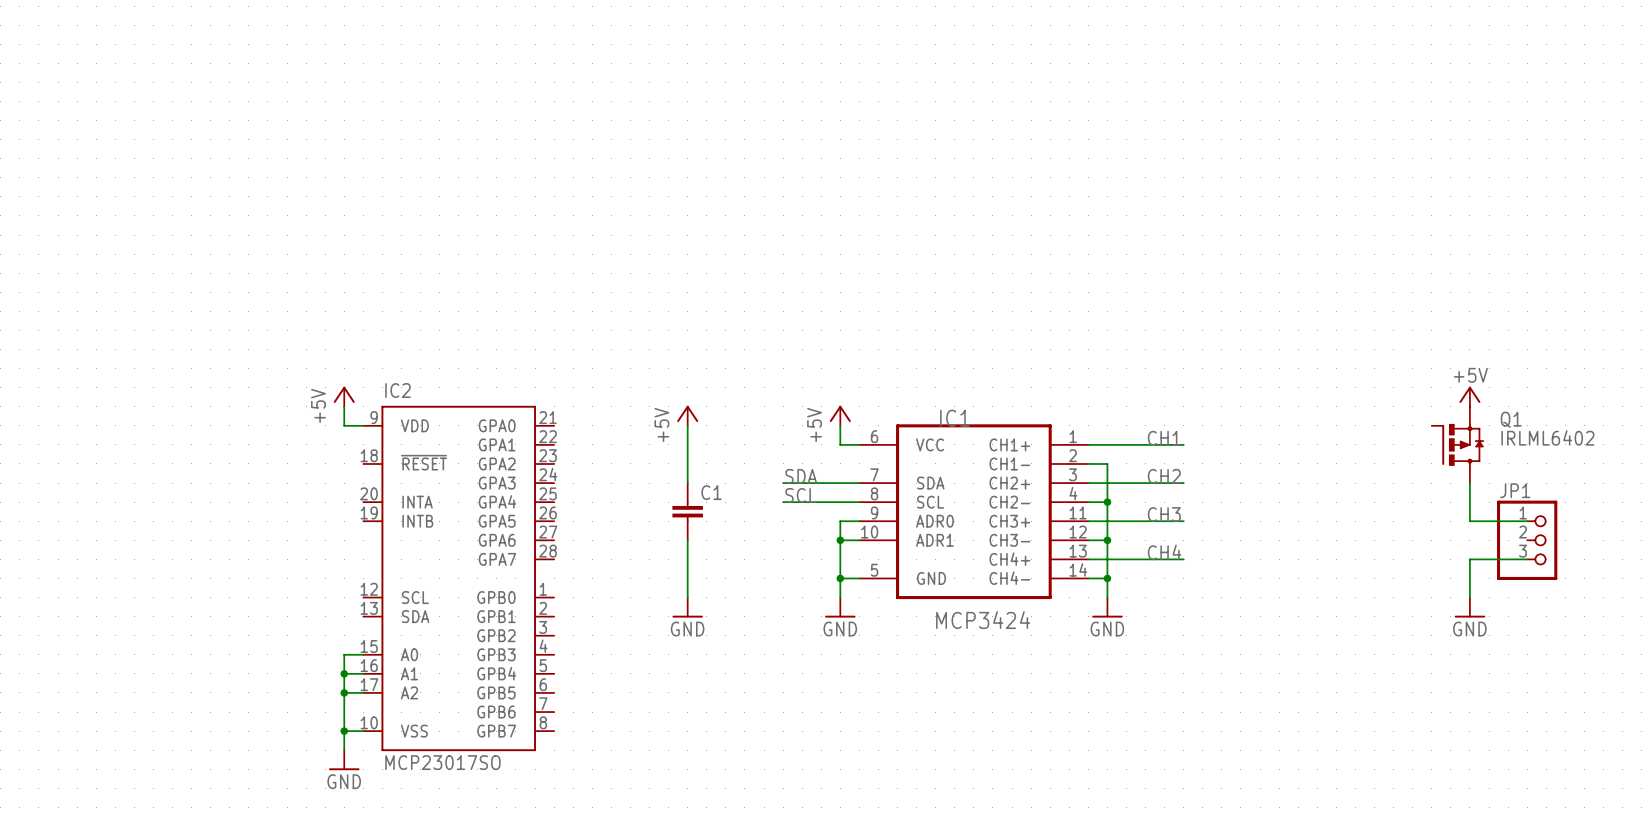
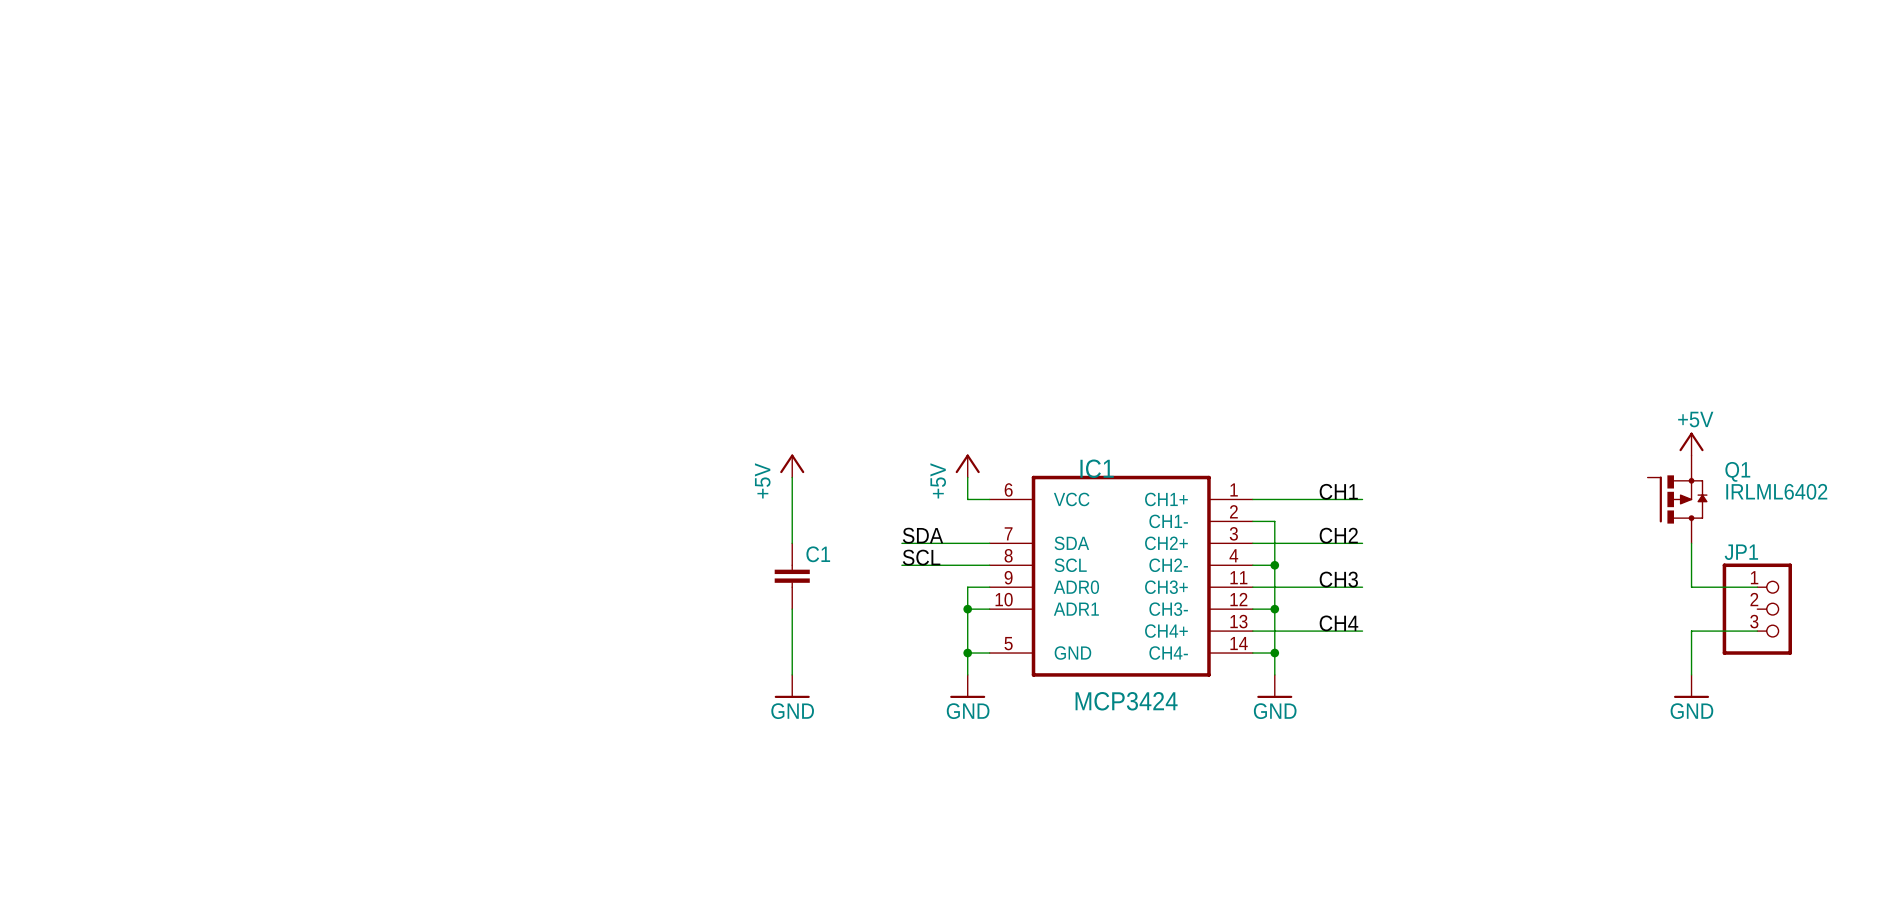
power symbol: +5V (344, 396) -> none
wire: (344, 406) (344, 425) (363, 425) -> none
IC2: MCP23017SO (458, 578) -> none
wire: (363, 654) (344, 654) (344, 750) -> none
wire: (344, 673) (363, 673) -> none
junction: (344, 673) -> none
wire: (344, 692) (363, 692) -> none
junction: (344, 692) -> none
wire: (344, 731) (363, 731) -> none
junction: (344, 731) -> none
power symbol: GND (344, 760) -> none

